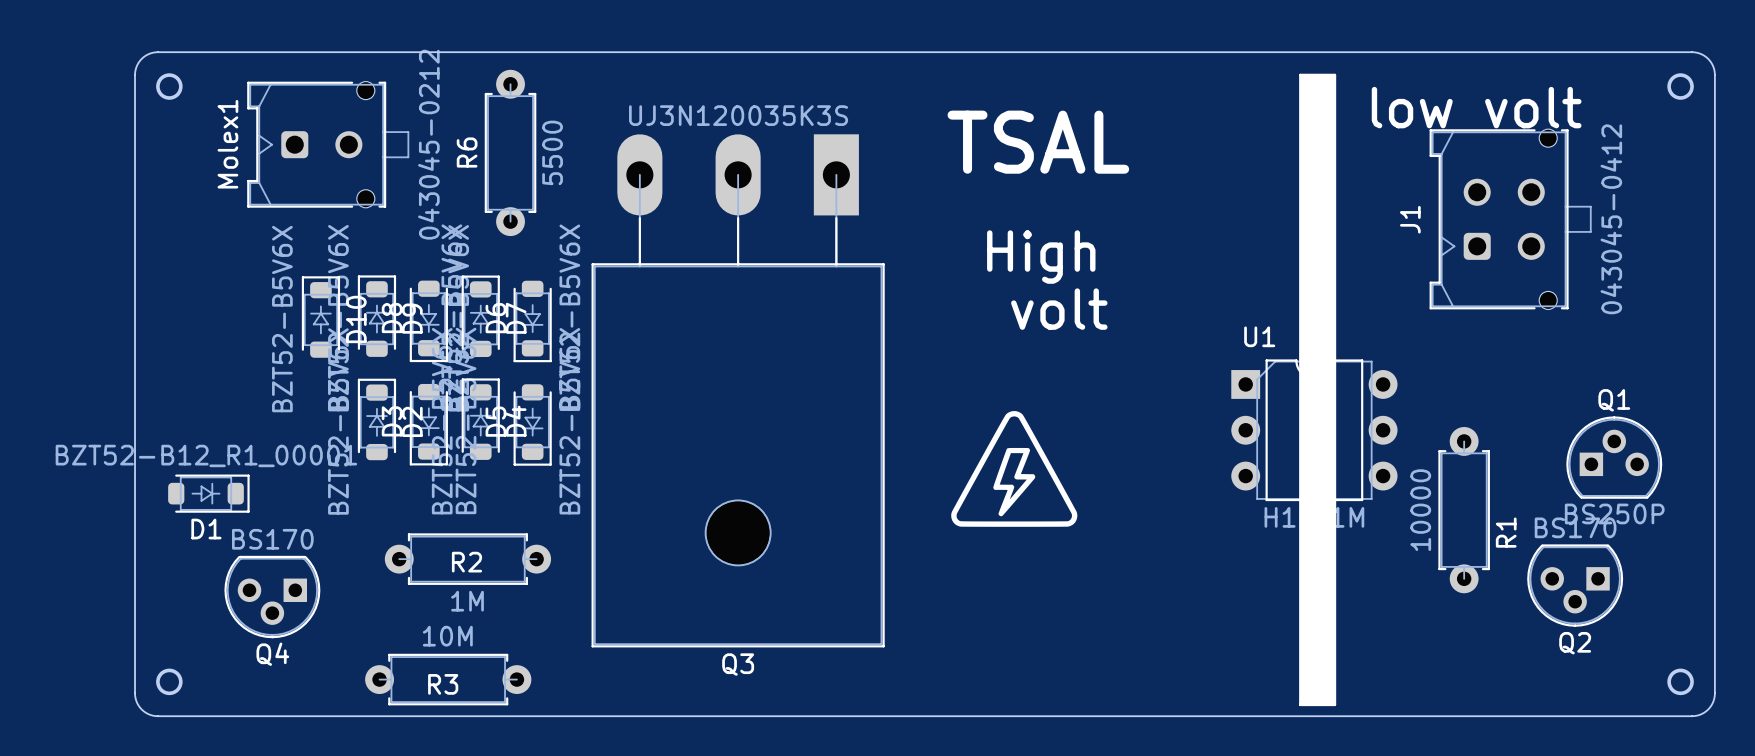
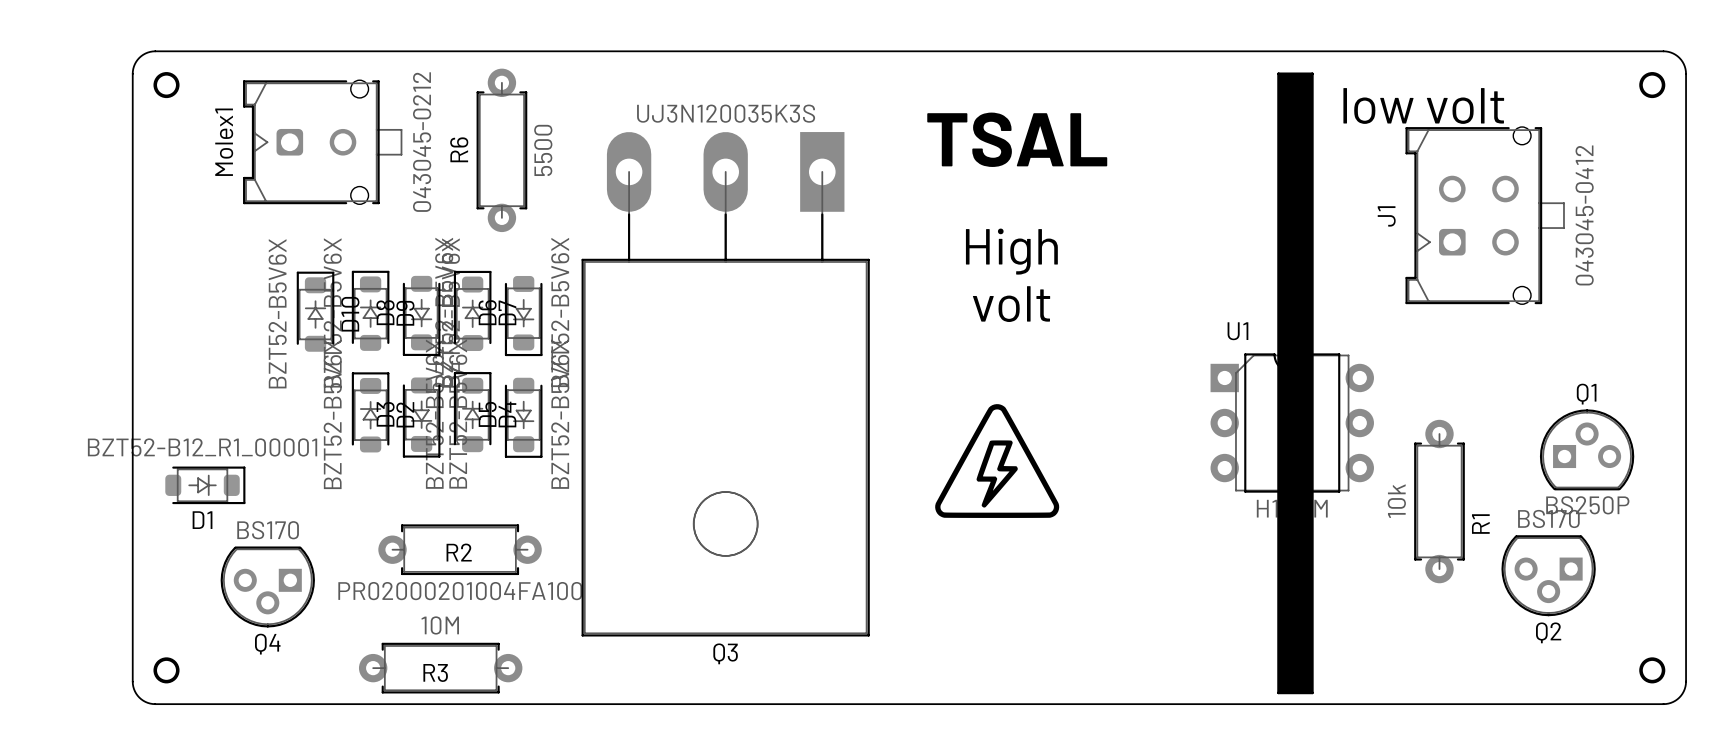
R1 value: 10000 (1420, 510) -> 10k (1396, 501)
R2 value: 1M (467, 601) -> PR02000201004FA100 (460, 591)

